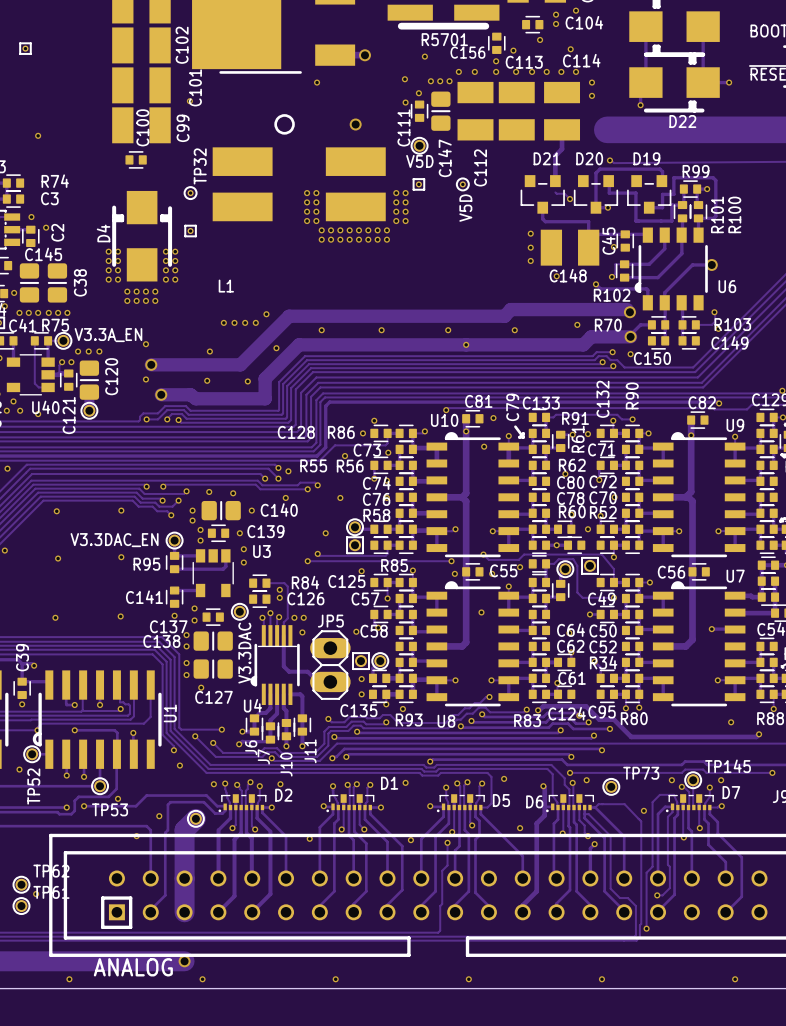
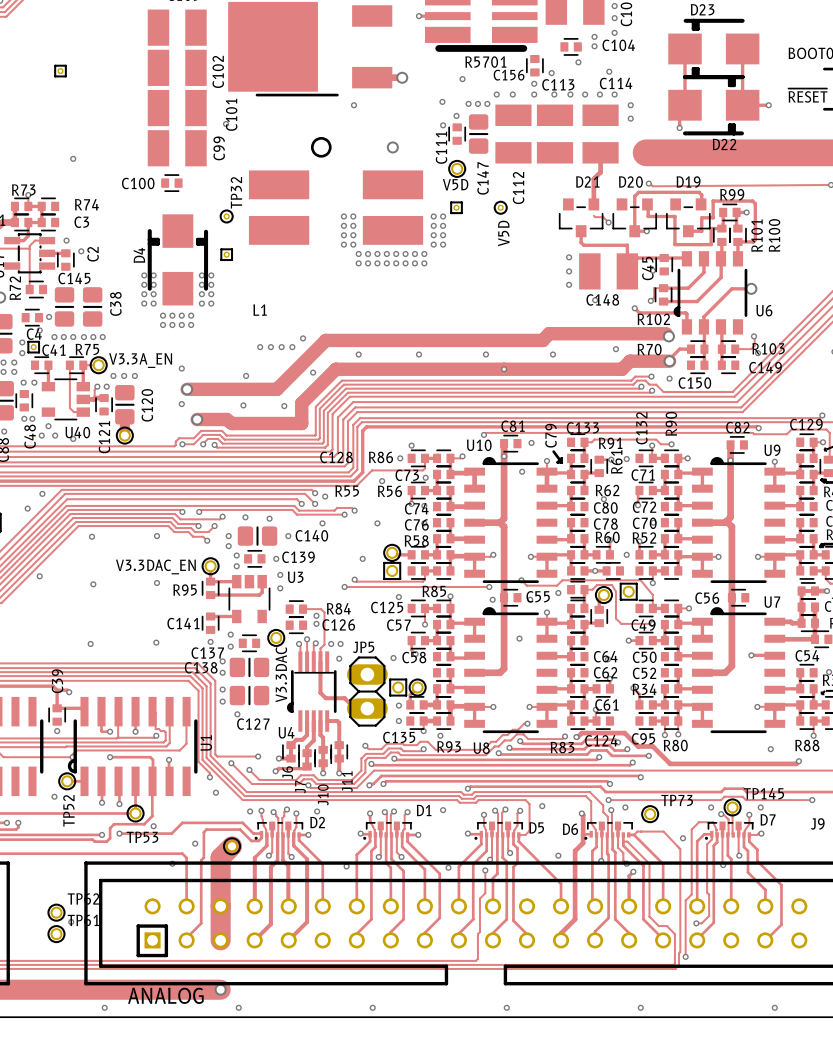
C100 name rotation: 0° (142, 127) -> 90° clockwise (138, 183)
C100 name position: C100 (142, 127) -> C100 (138, 183)

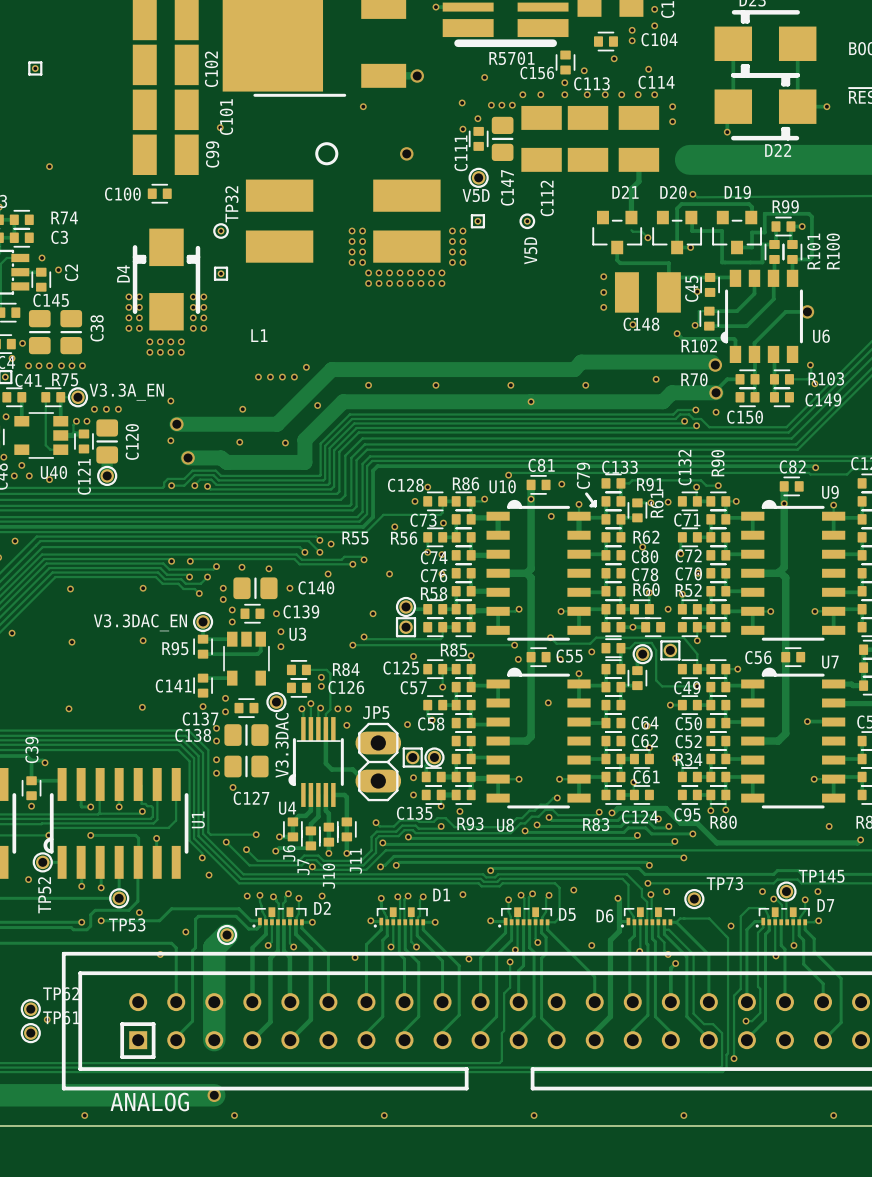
C128 name position: C128 (336, 457) -> C128 (405, 485)
R86 name position: R86 (380, 457) -> R86 (466, 483)

